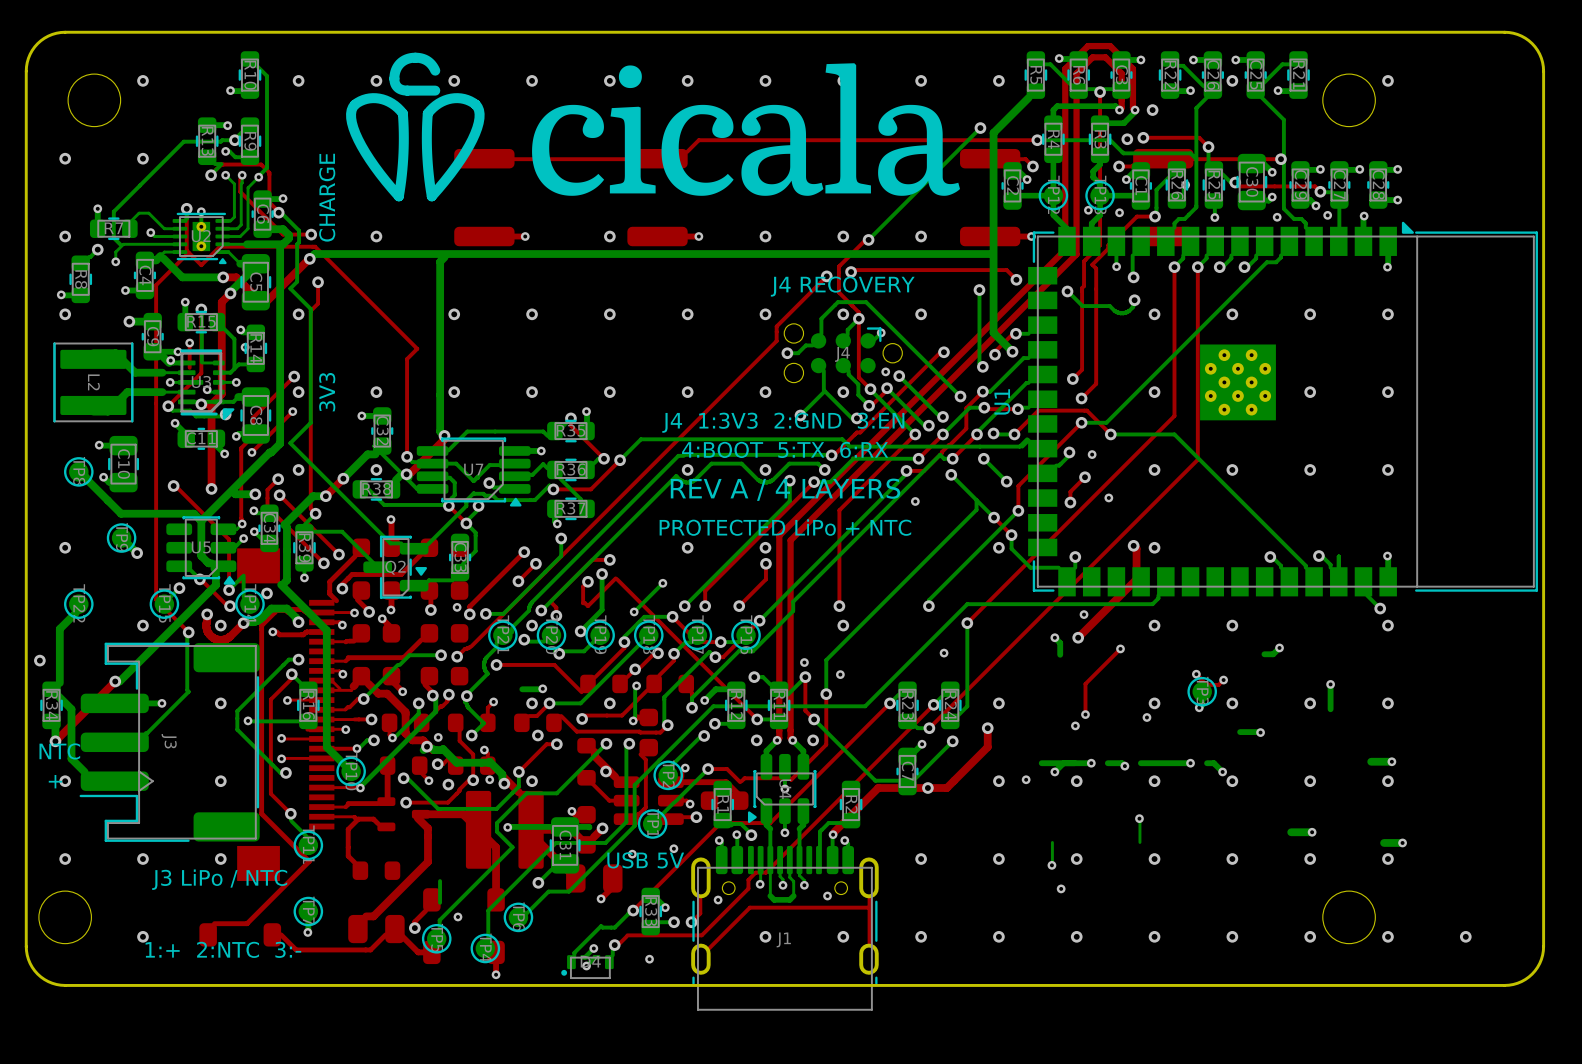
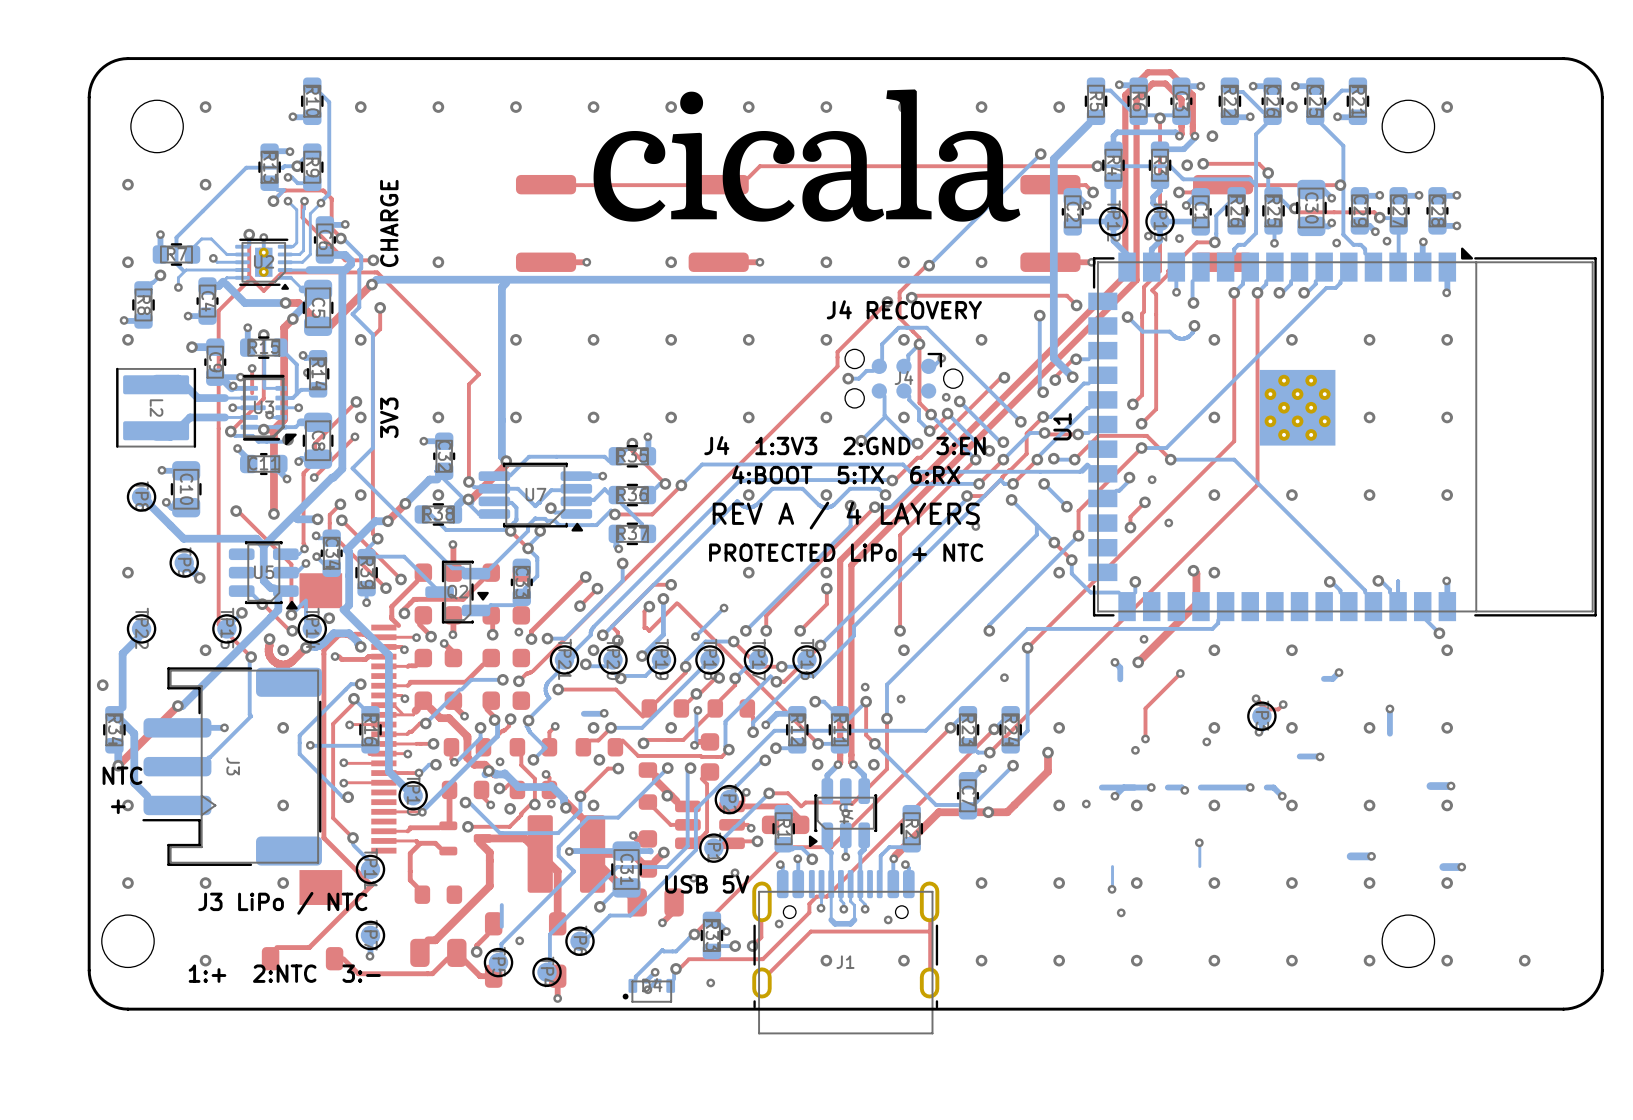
line: (435, 70) (425, 60) (410, 58) (398, 65) (394, 78) (396, 85) (401, 89) (435, 90) -> none
line: (354, 104) (366, 98) (379, 98) (391, 103) (402, 113) (403, 153) (398, 196) (374, 166) (358, 139) (351, 118) (351, 110) (354, 104) -> none
line: (475, 104) (464, 98) (451, 98) (438, 103) (427, 113) (427, 153) (431, 196) (456, 166) (472, 139) (479, 118) (479, 110) (475, 104) -> none

